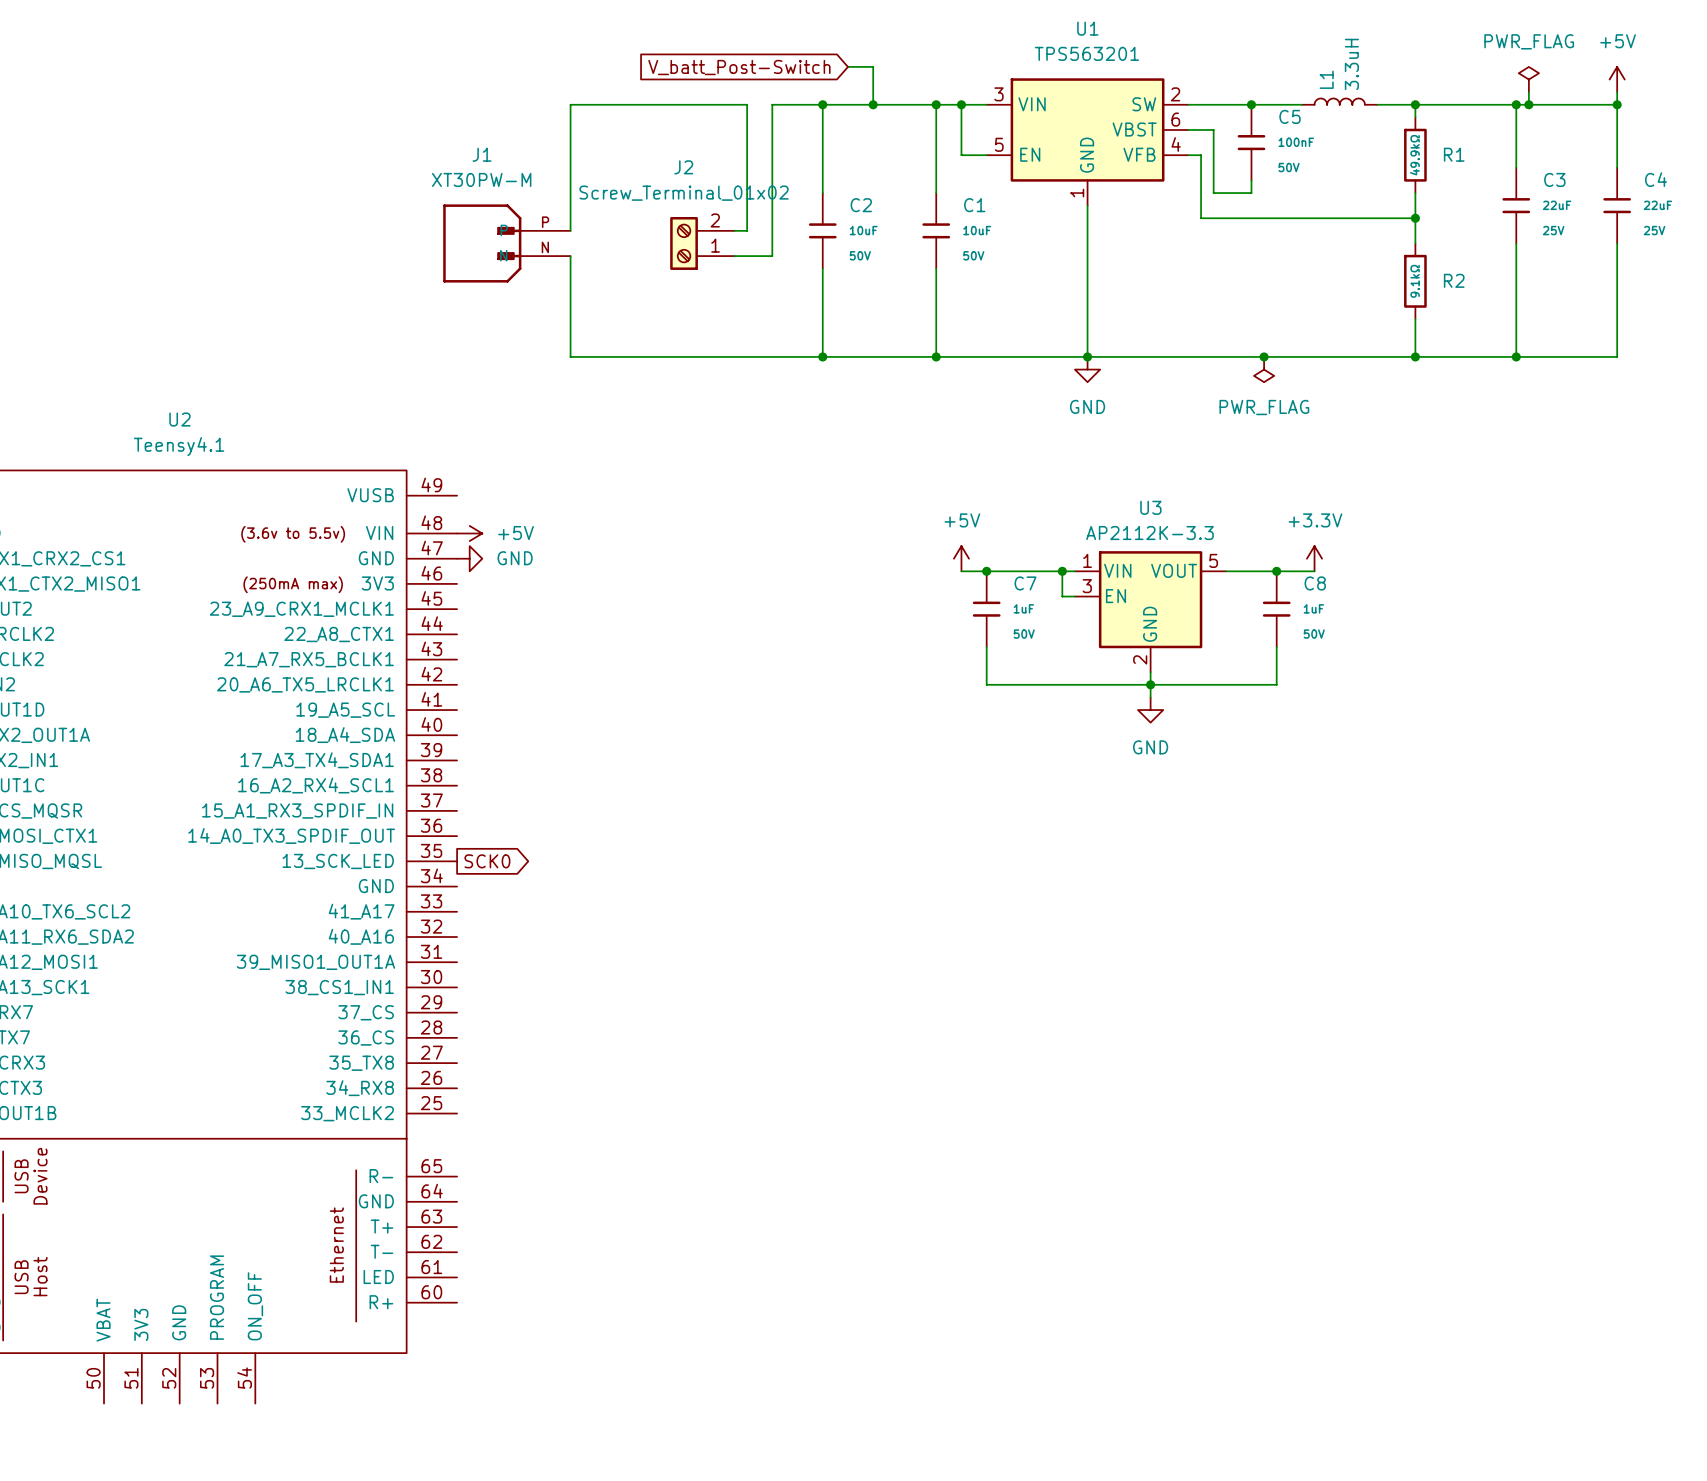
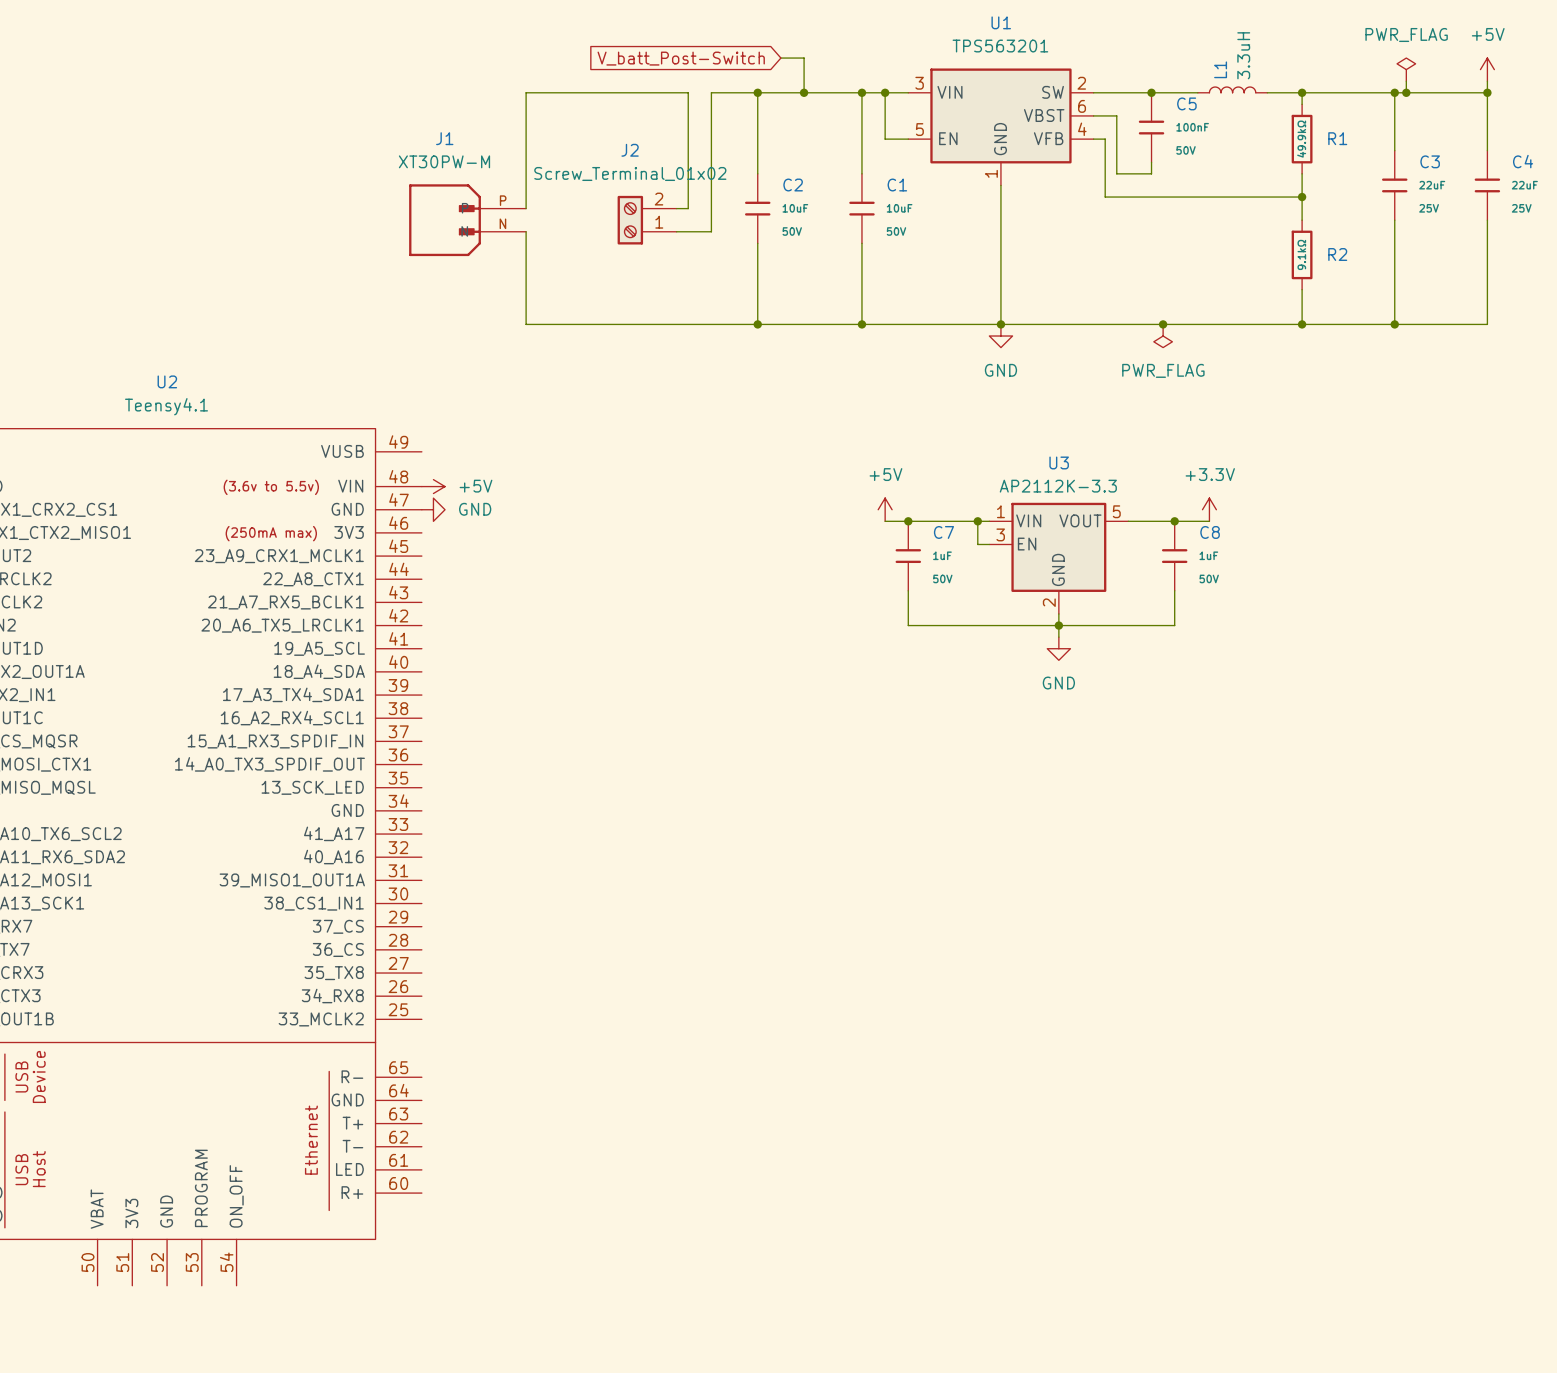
global label: SCK0 (487, 861) -> none

